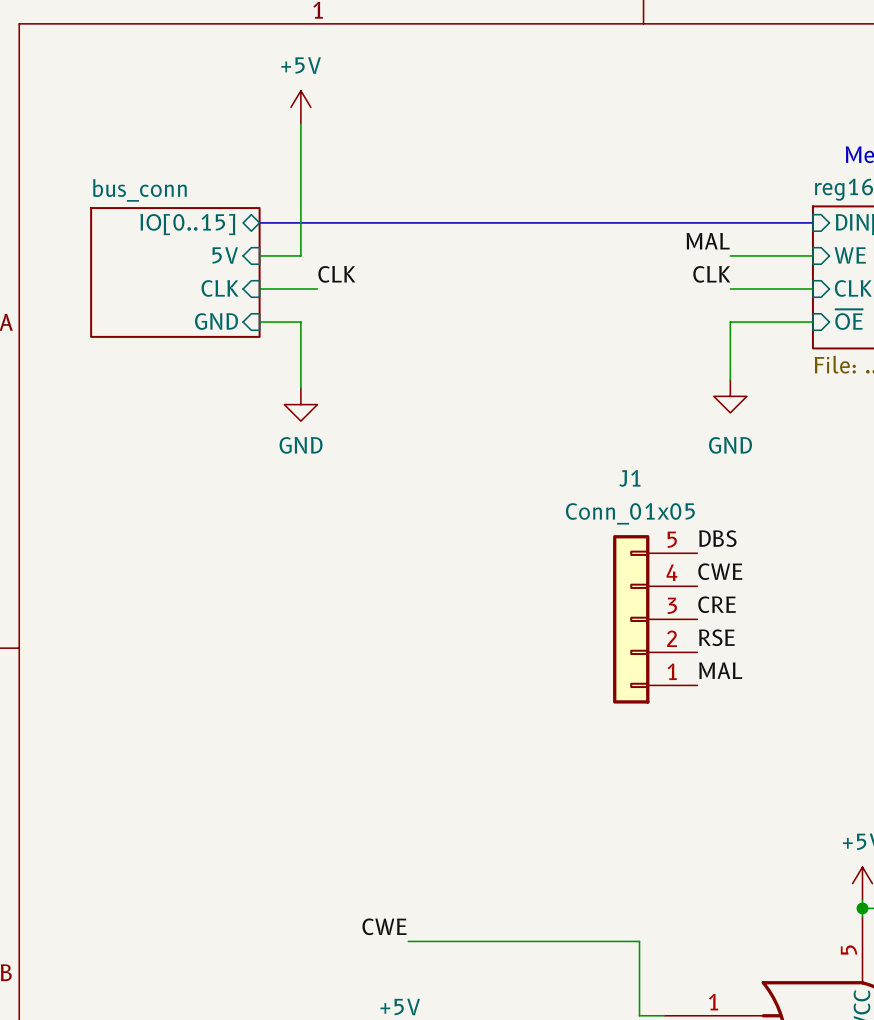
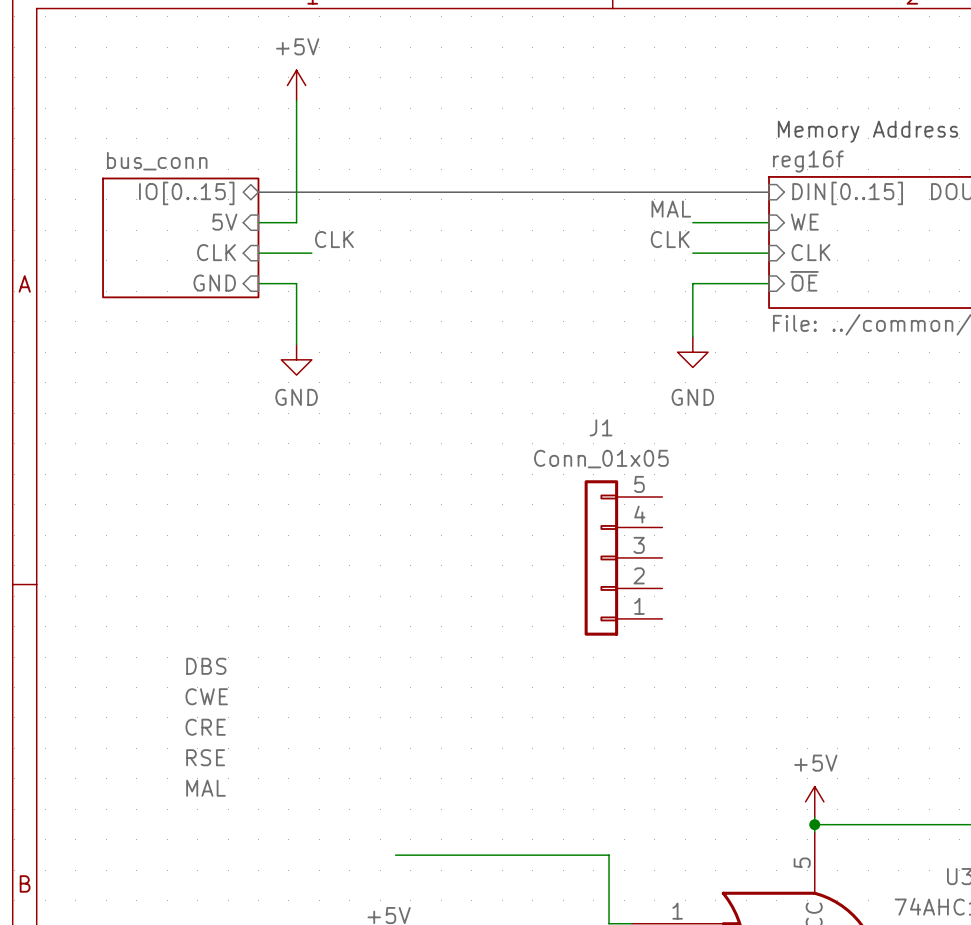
label: DBS (717, 538) -> none
label: CWE (720, 571) -> none
label: CRE (717, 604) -> none
label: RSE (716, 637) -> none
label: MAL (720, 670) -> none
label: none -> DBS (206, 666)
label: none -> CWE (206, 696)
label: none -> CRE (205, 727)
label: none -> RSE (205, 757)
label: none -> MAL (205, 788)
label: CWE (384, 926) -> none

